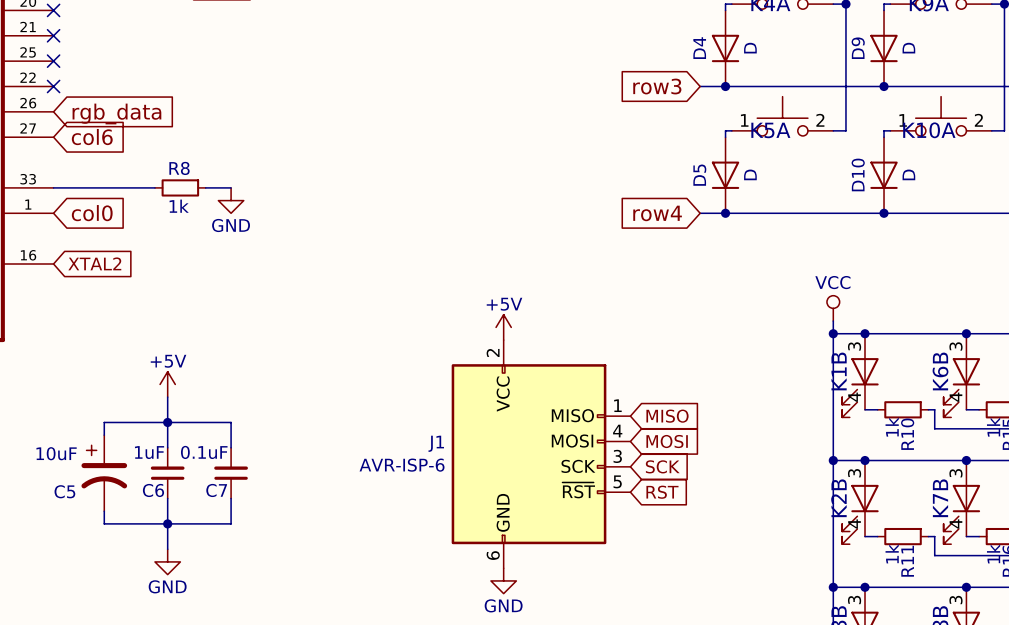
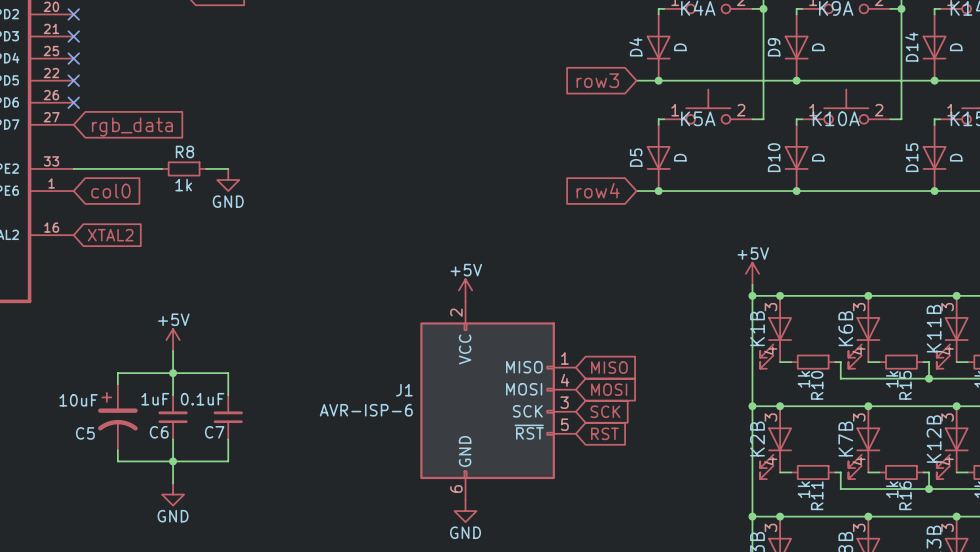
no-connect mark: none -> (73, 102)
global label: rgb_data (116, 113) -> none
global label: col6 (92, 137) -> rgb_data (132, 127)
power symbol: VCC (833, 308) -> +5V (752, 273)

